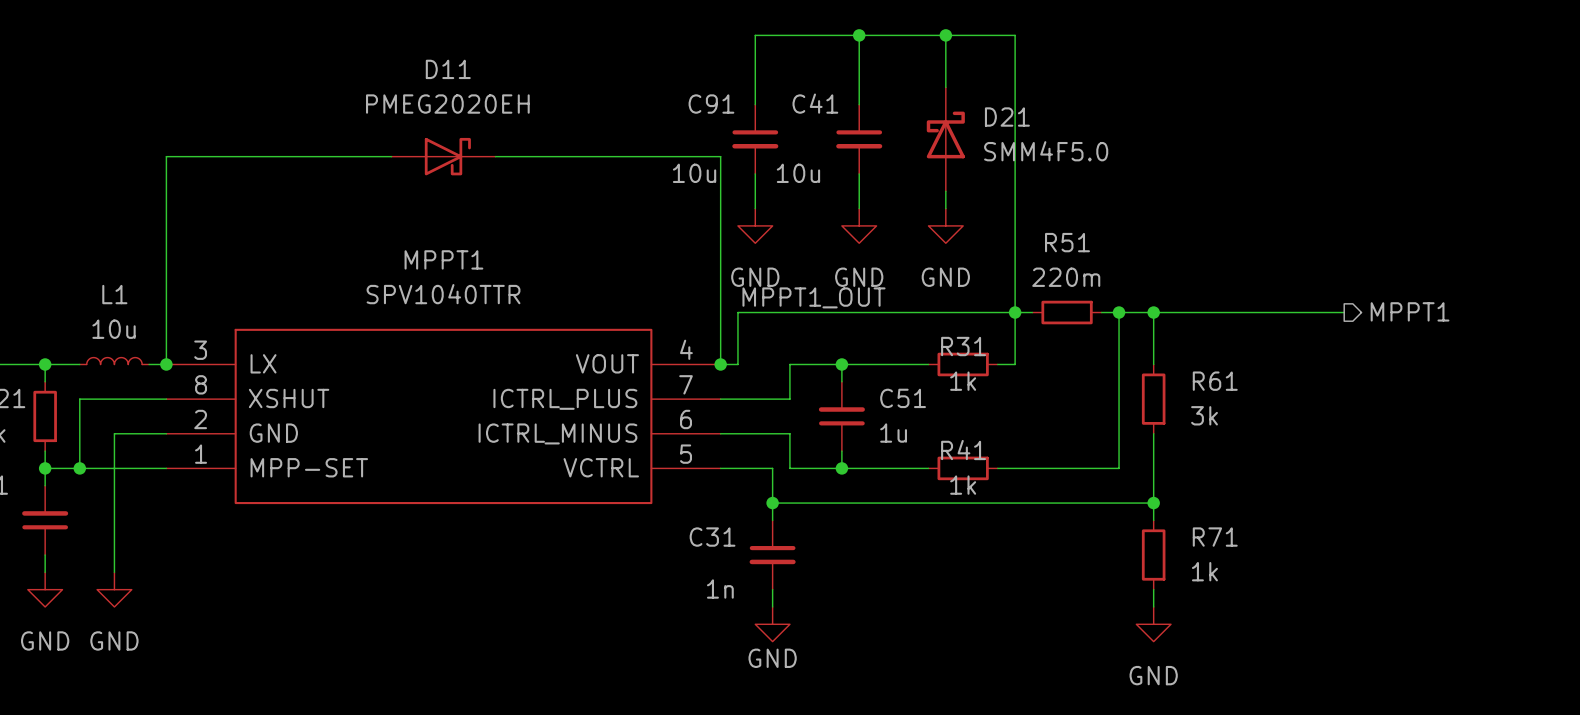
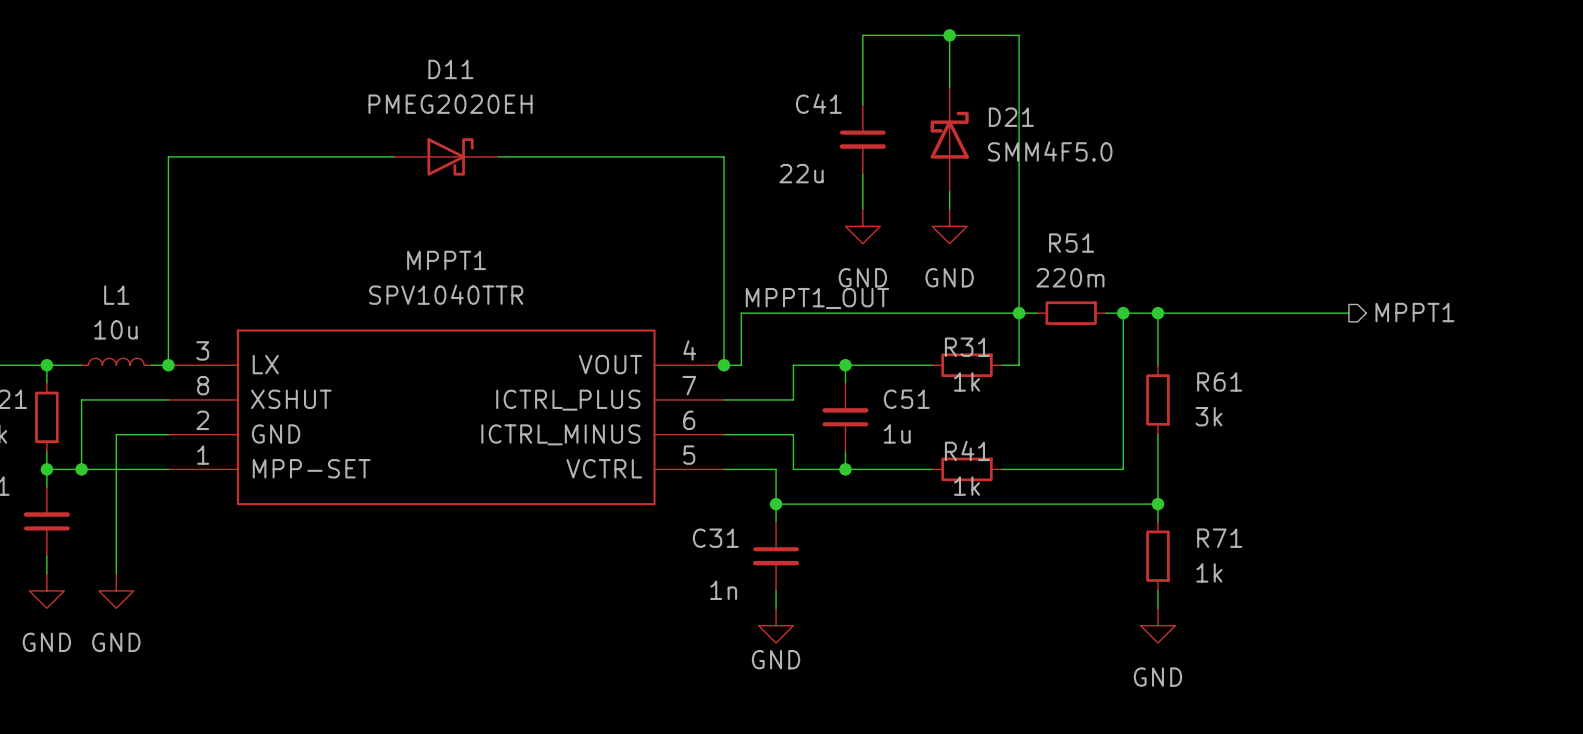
wire: (859, 35) (755, 35) (755, 104) -> none
junction: (859, 35) -> none
C91: 10u (755, 139) -> none
wire: (755, 173) (755, 208) -> none
C41 value: 10u (798, 173) -> 22u (801, 173)
power symbol: GND (755, 225) -> none

